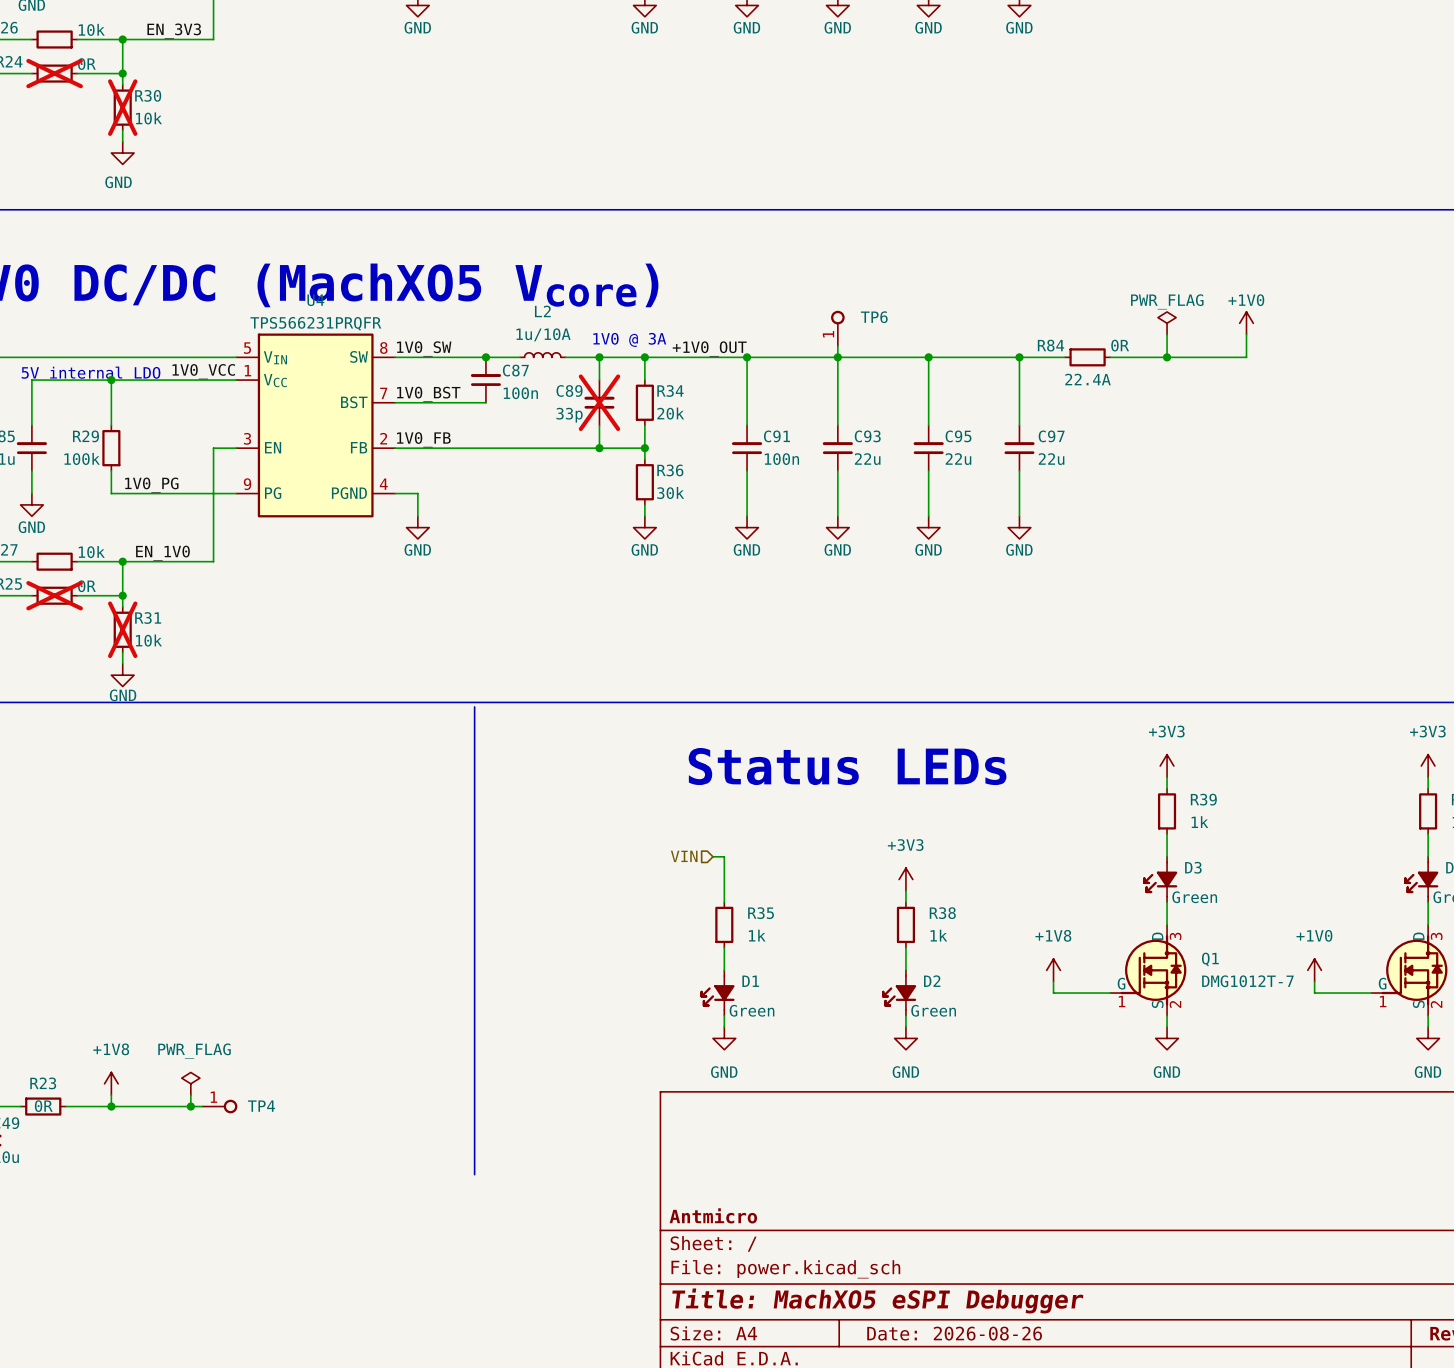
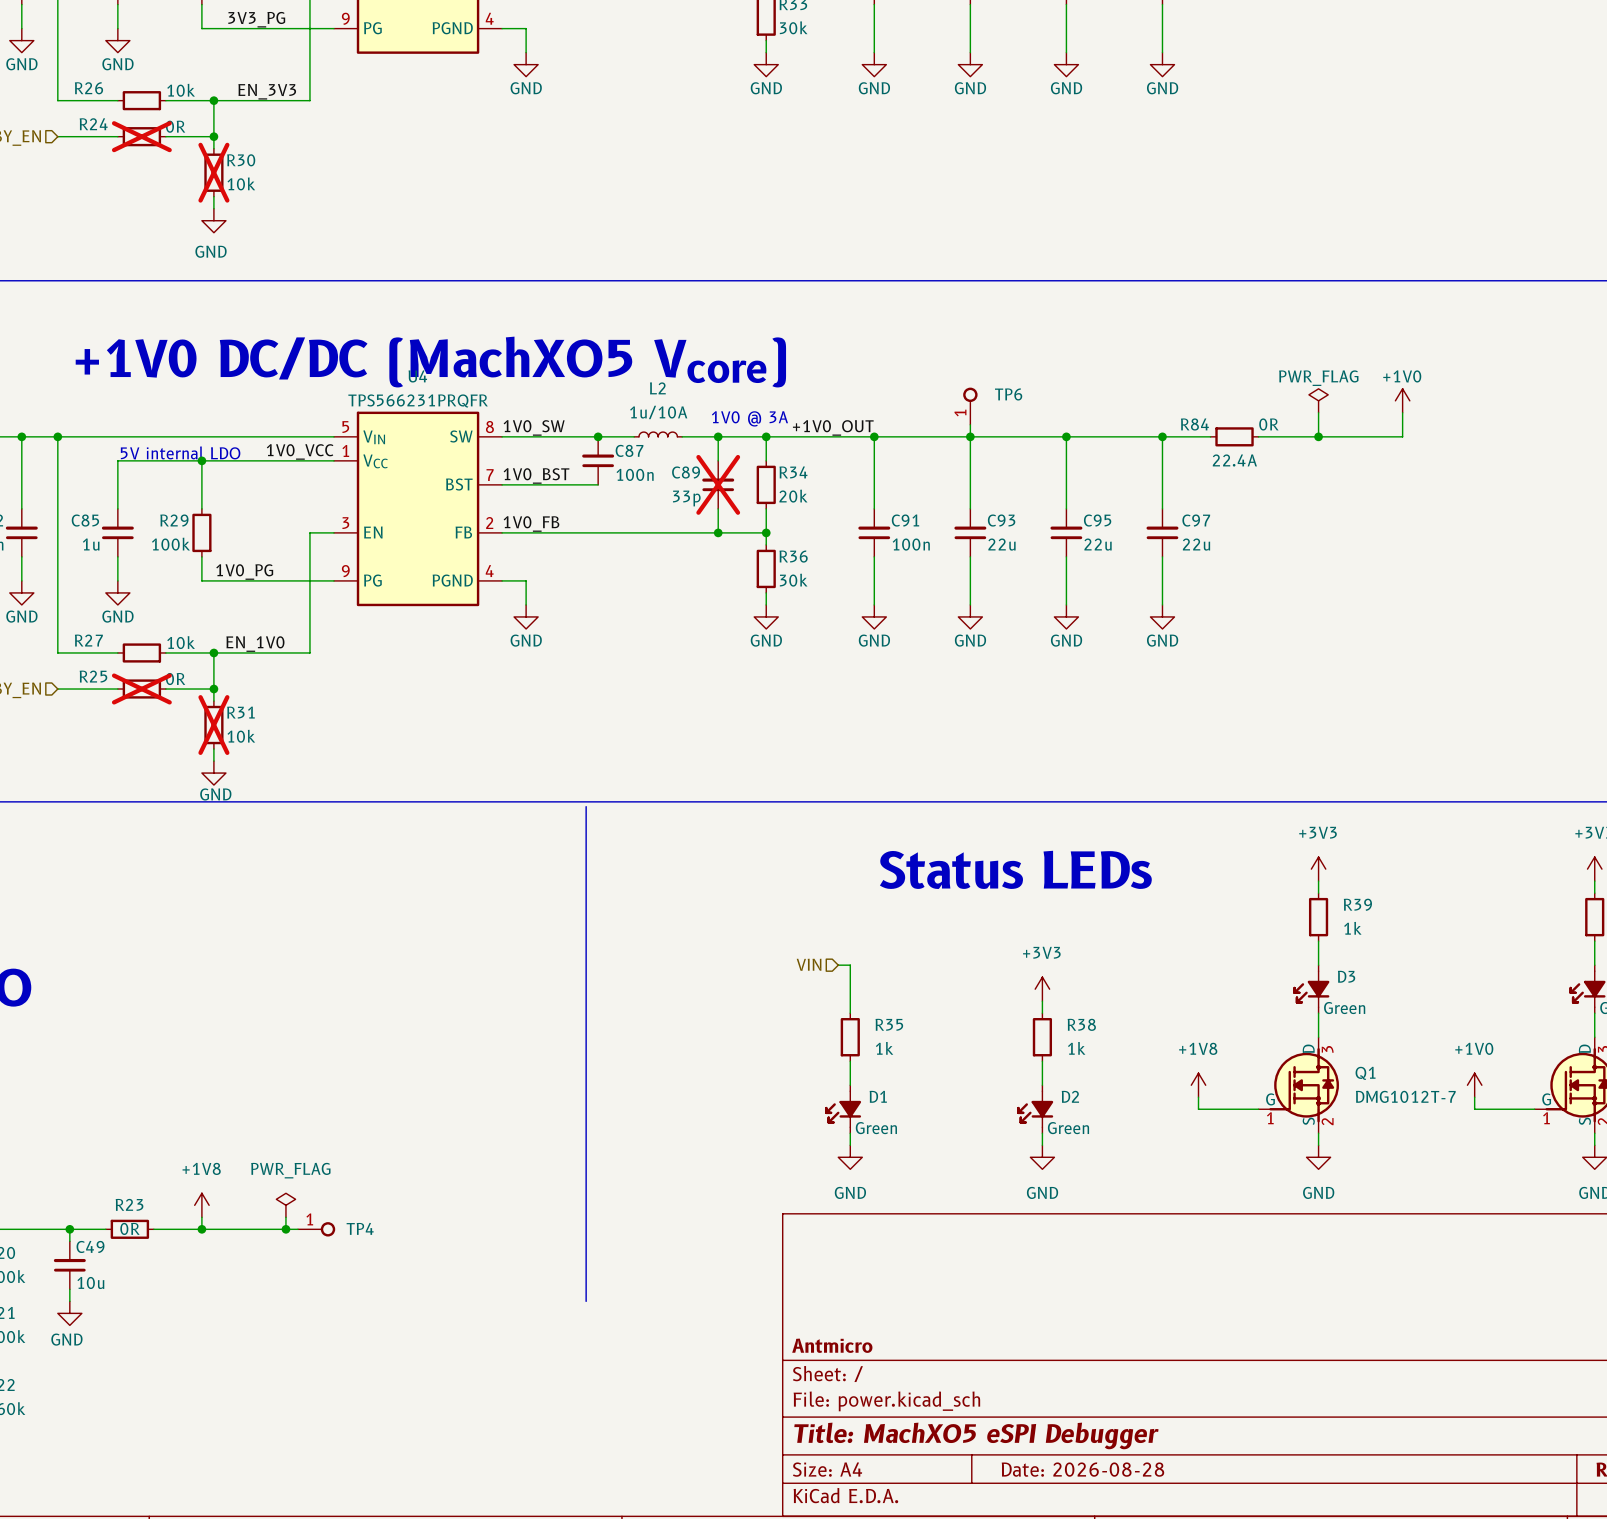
title block: Date: 2026-08-26 (954, 1333) -> Date: 2026-08-28 (1082, 1469)

